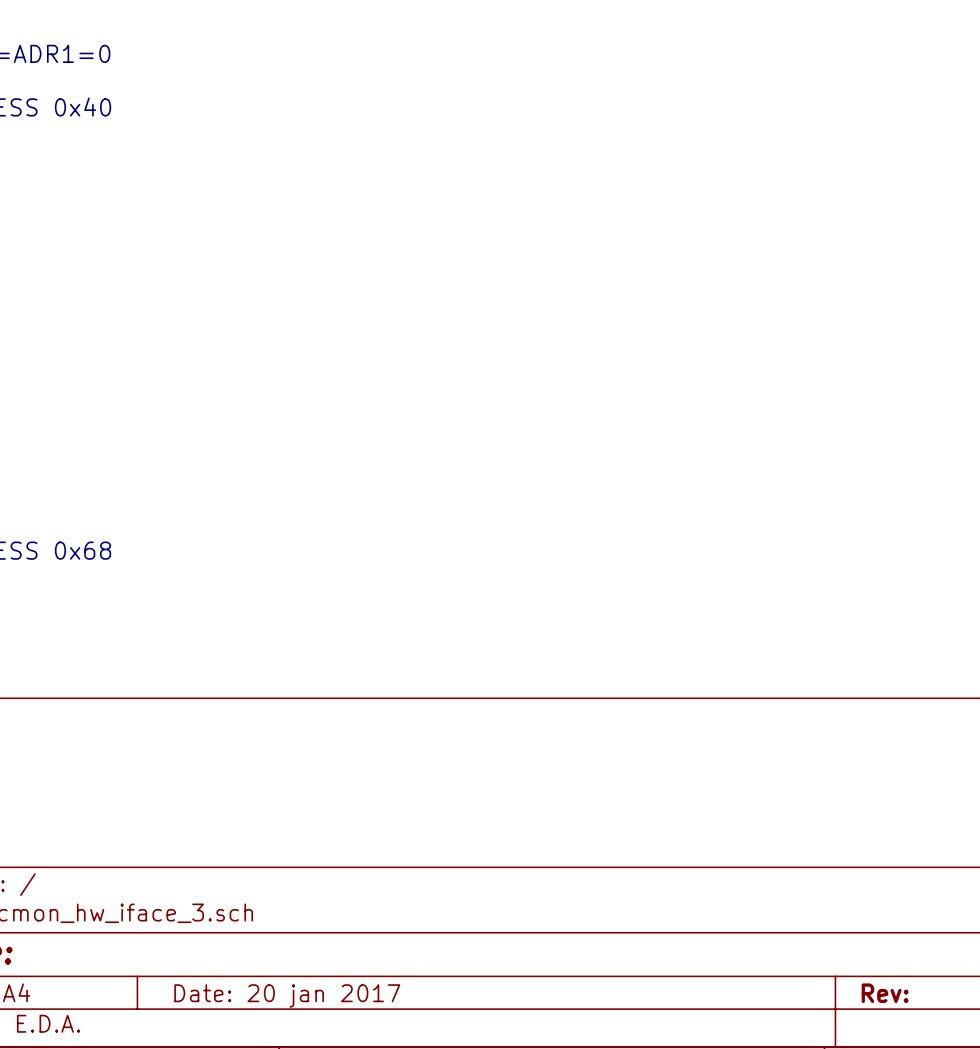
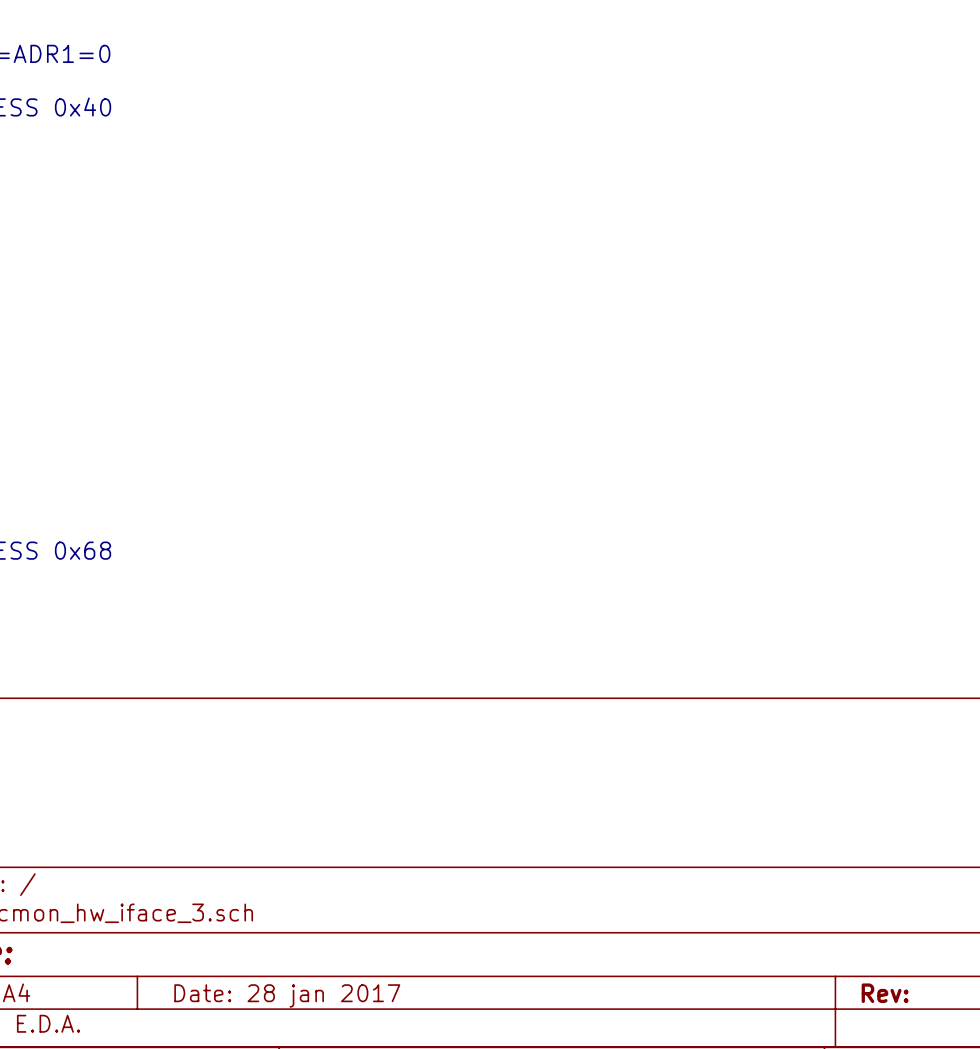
title block: Date: 20 jan 2017 (287, 995) -> Date: 28 jan 2017 (287, 995)

